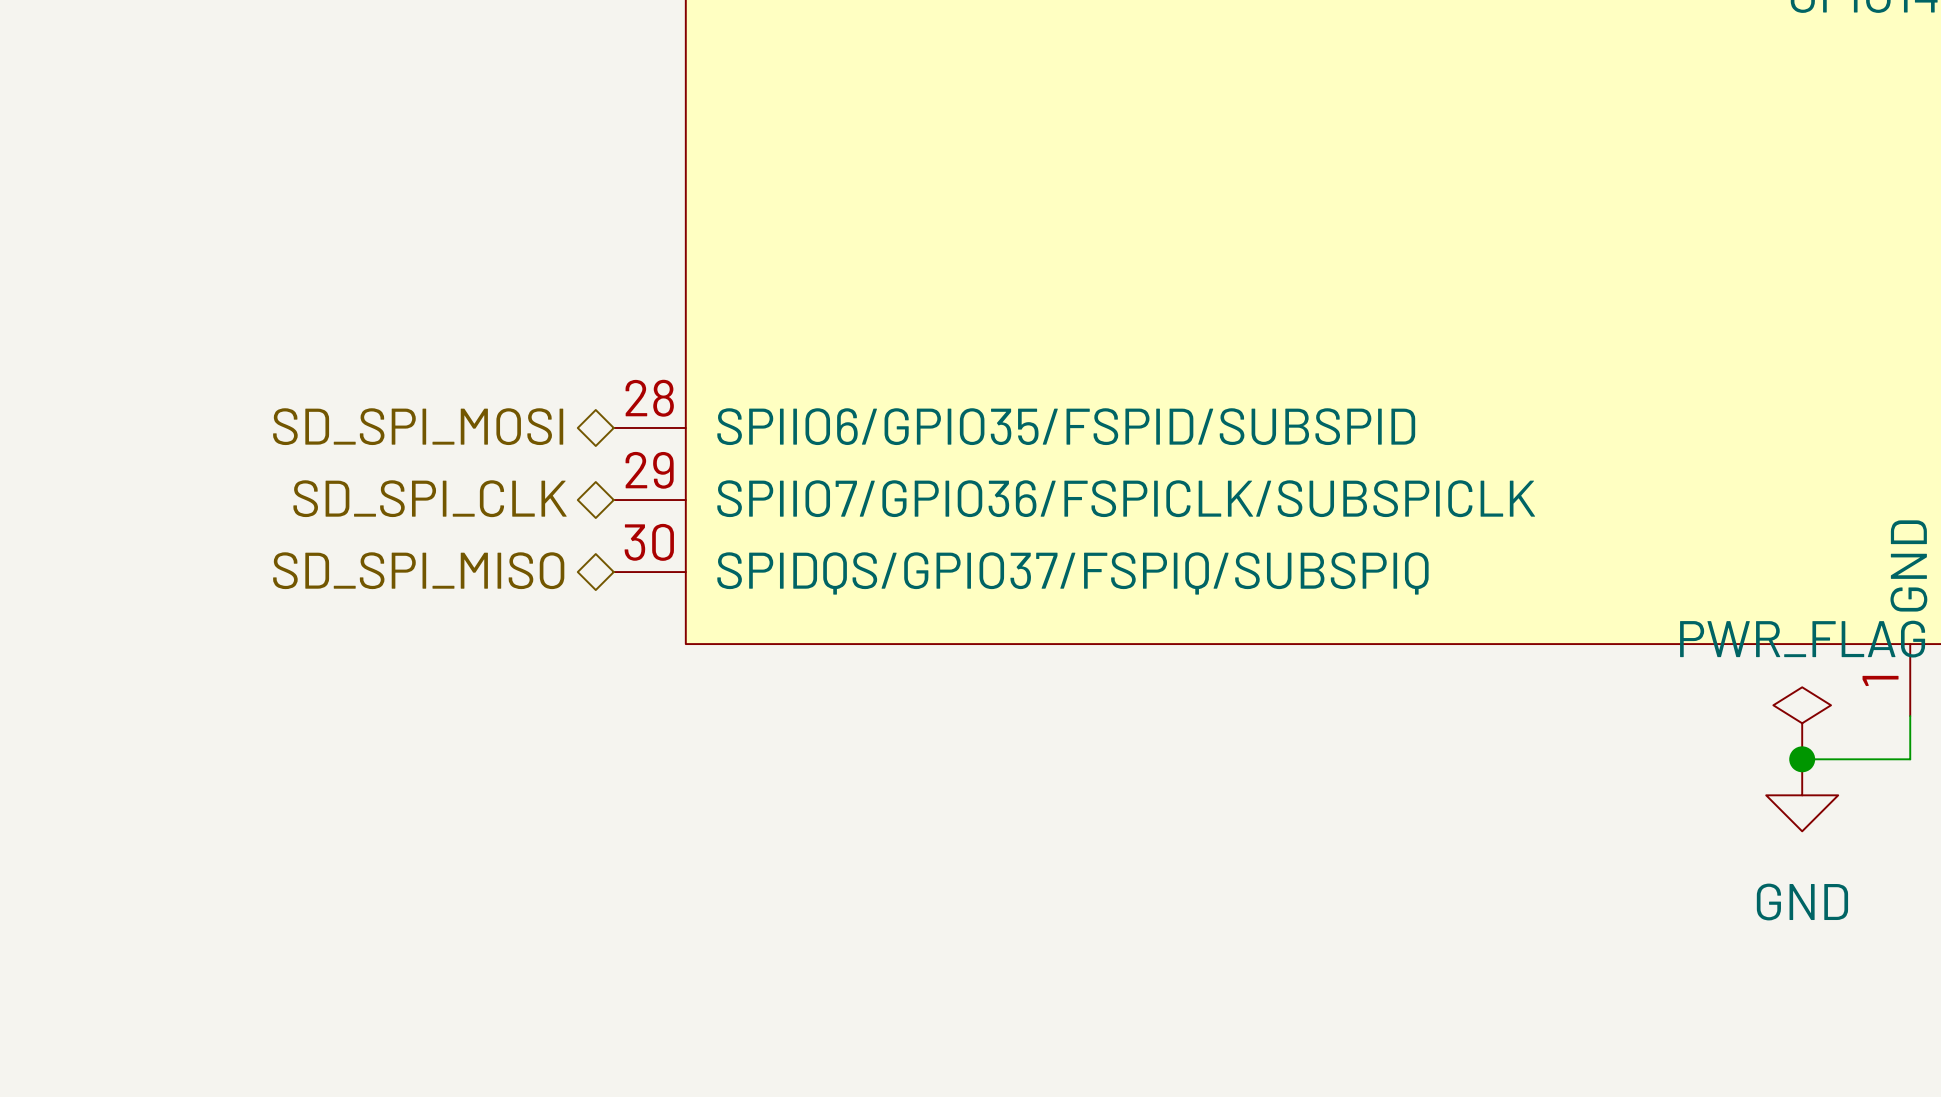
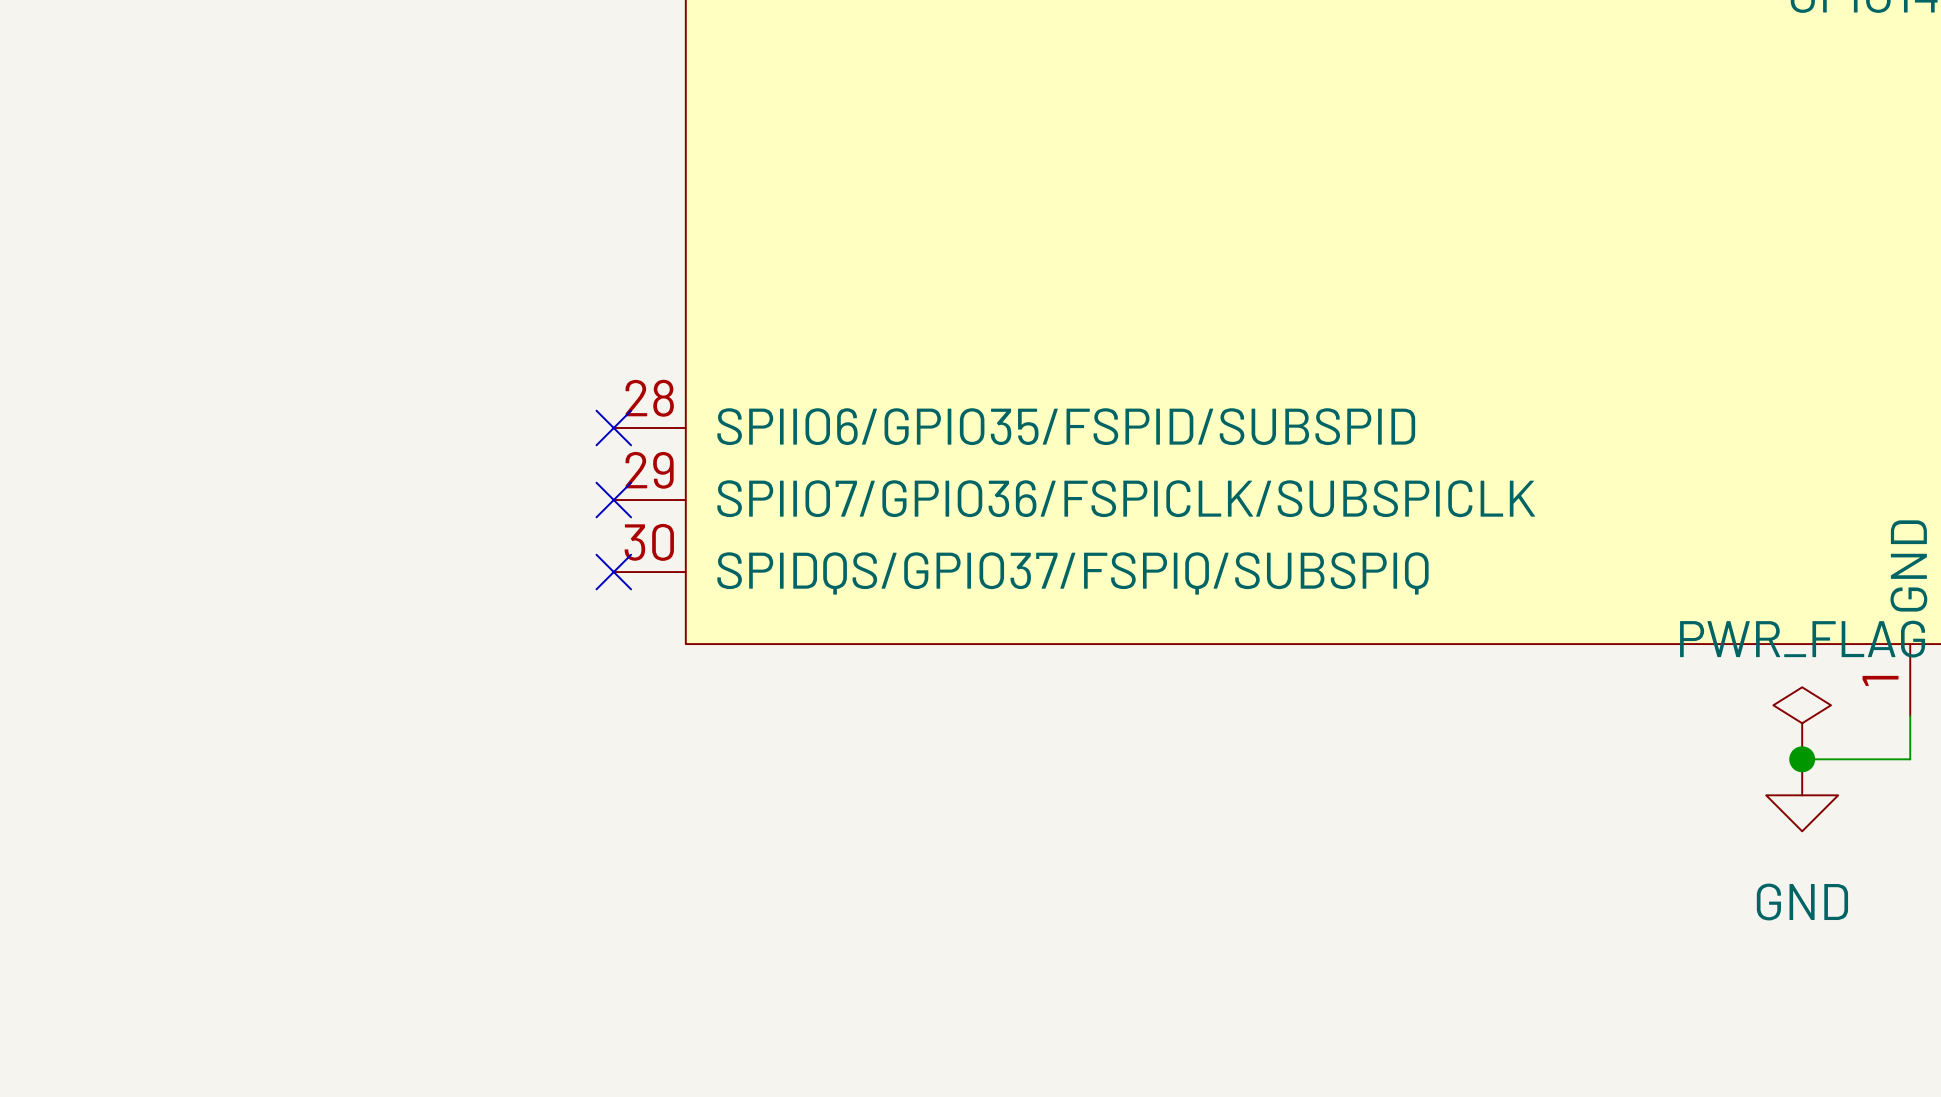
hierarchical label: SD_SPI_MOSI (418, 426) -> none
no-connect mark: none -> (613, 427)
hierarchical label: SD_SPI_CLK (430, 498) -> none
no-connect mark: none -> (613, 500)
hierarchical label: SD_SPI_MISO (418, 570) -> none
no-connect mark: none -> (613, 572)

